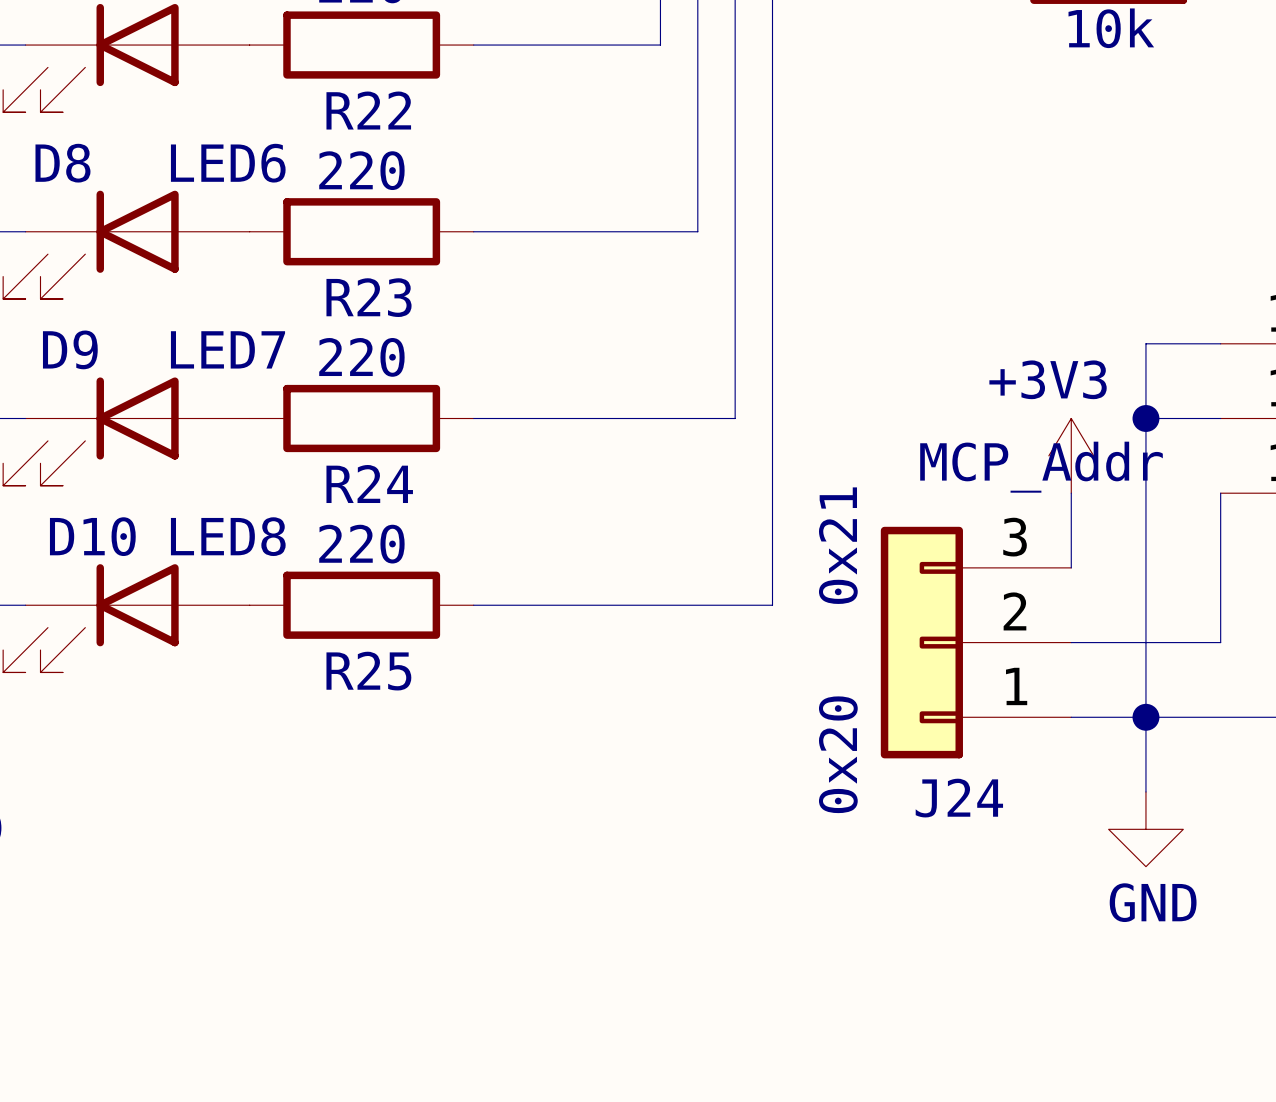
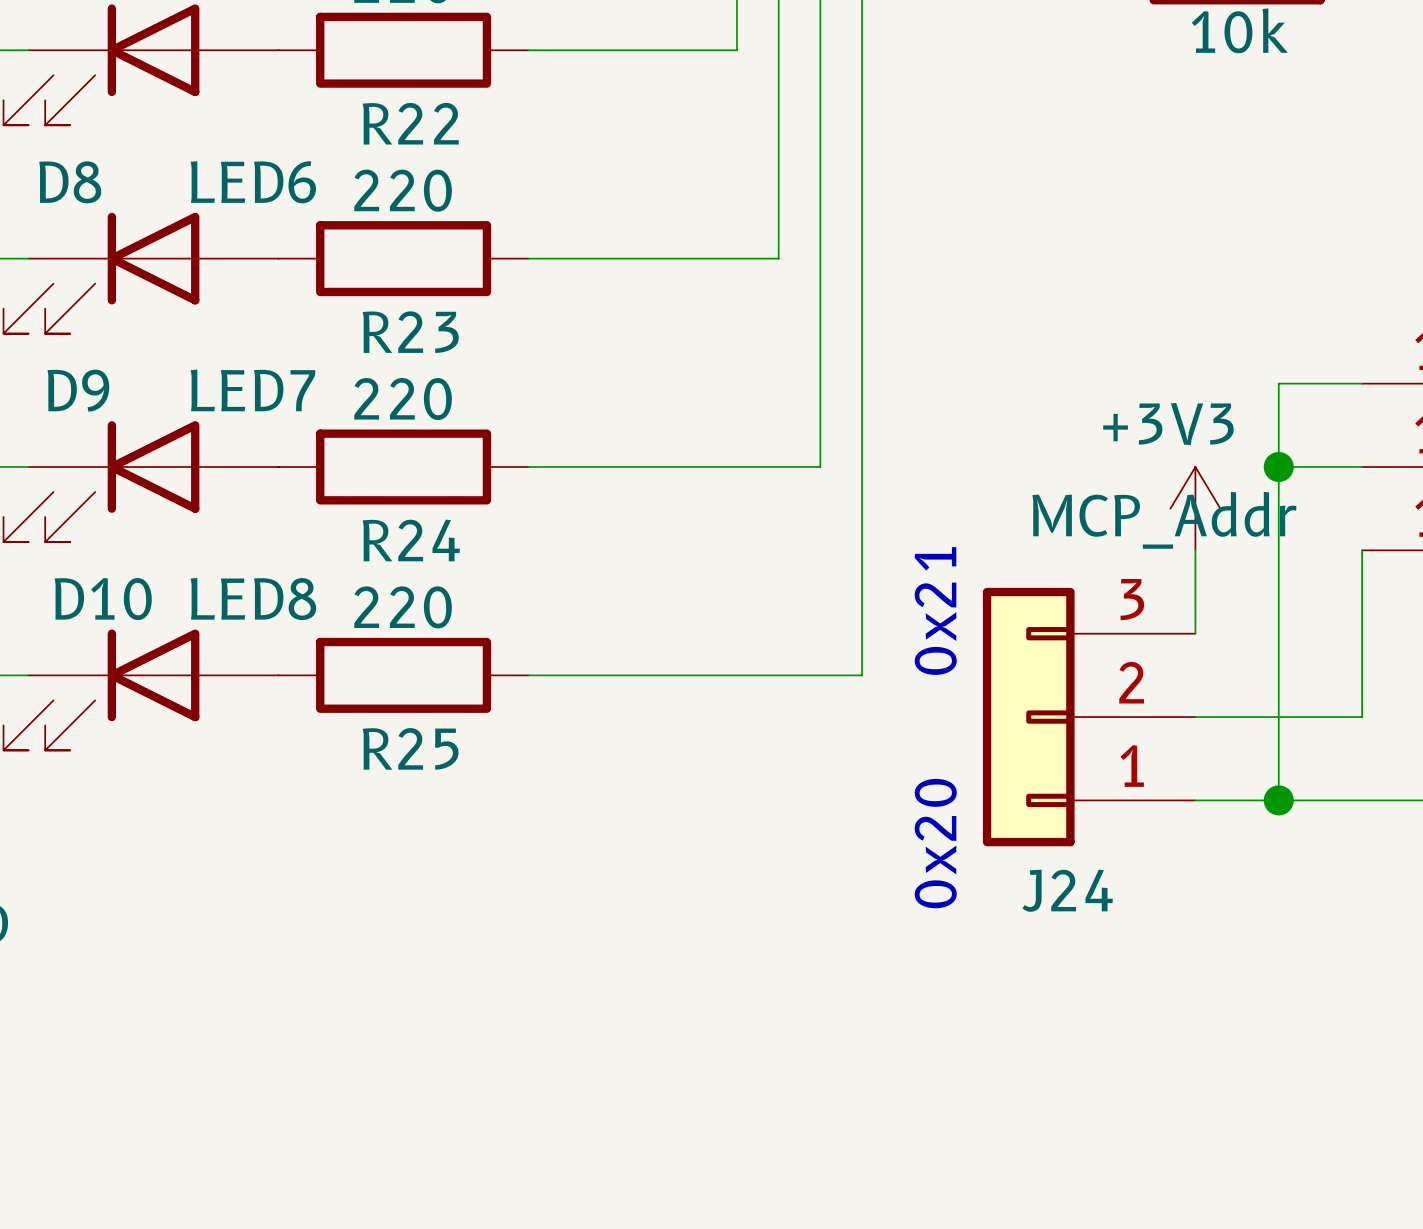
wire: (1145, 717) (1145, 791) -> none
power symbol: GND (1145, 829) -> none

